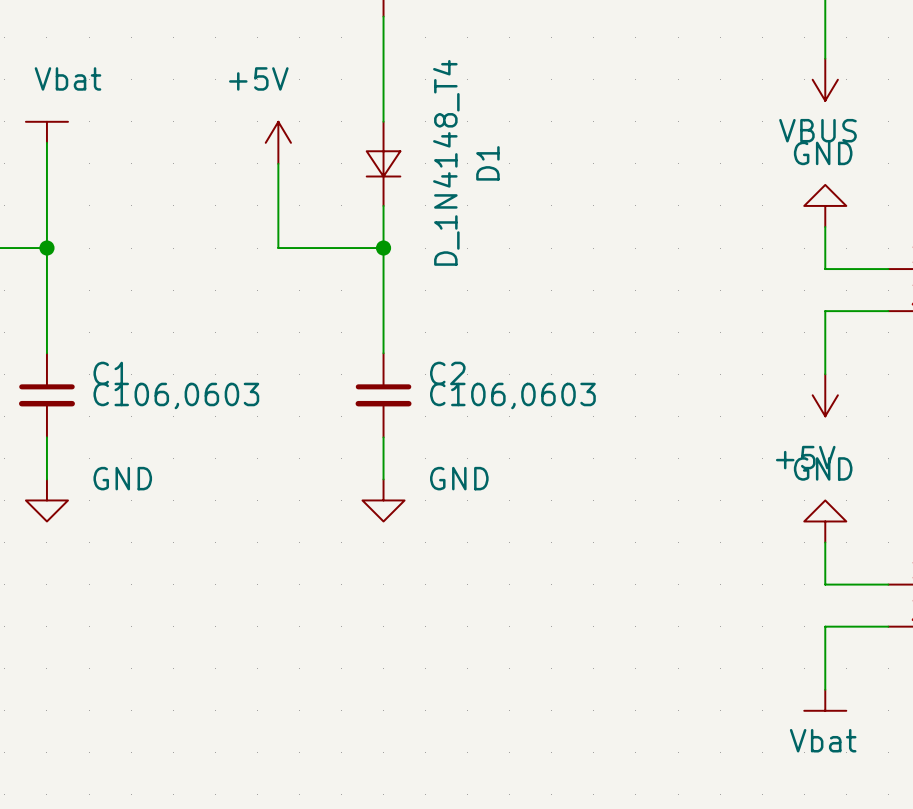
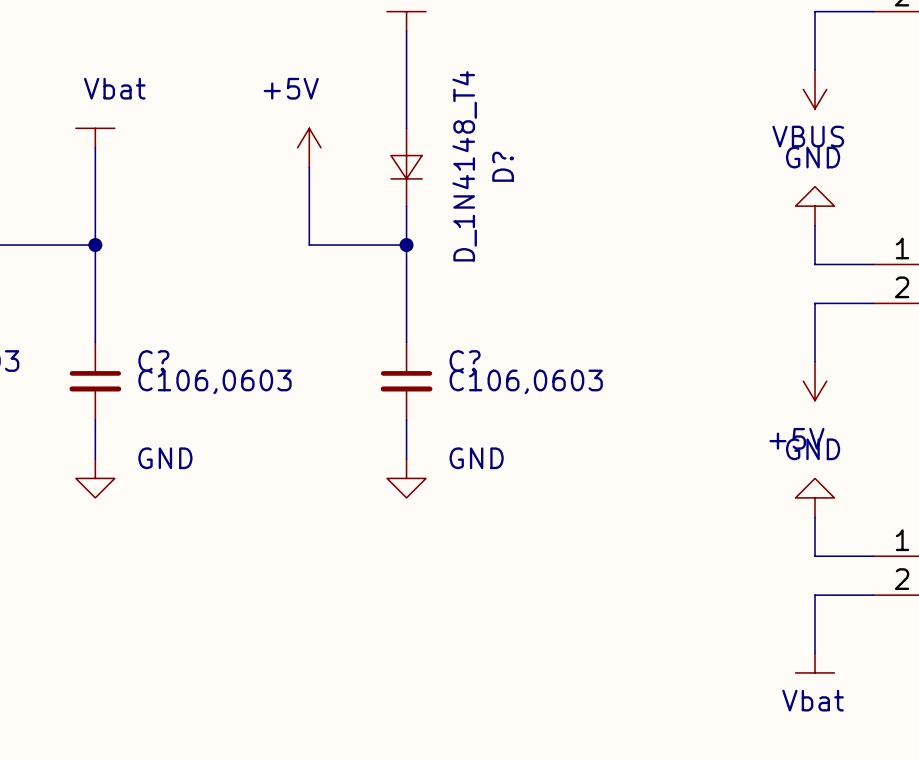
D1 name: D1 (487, 163) -> D? (503, 166)
C1 name: C1 (111, 373) -> C? (153, 361)
C2 name: C2 (447, 373) -> C? (465, 361)

